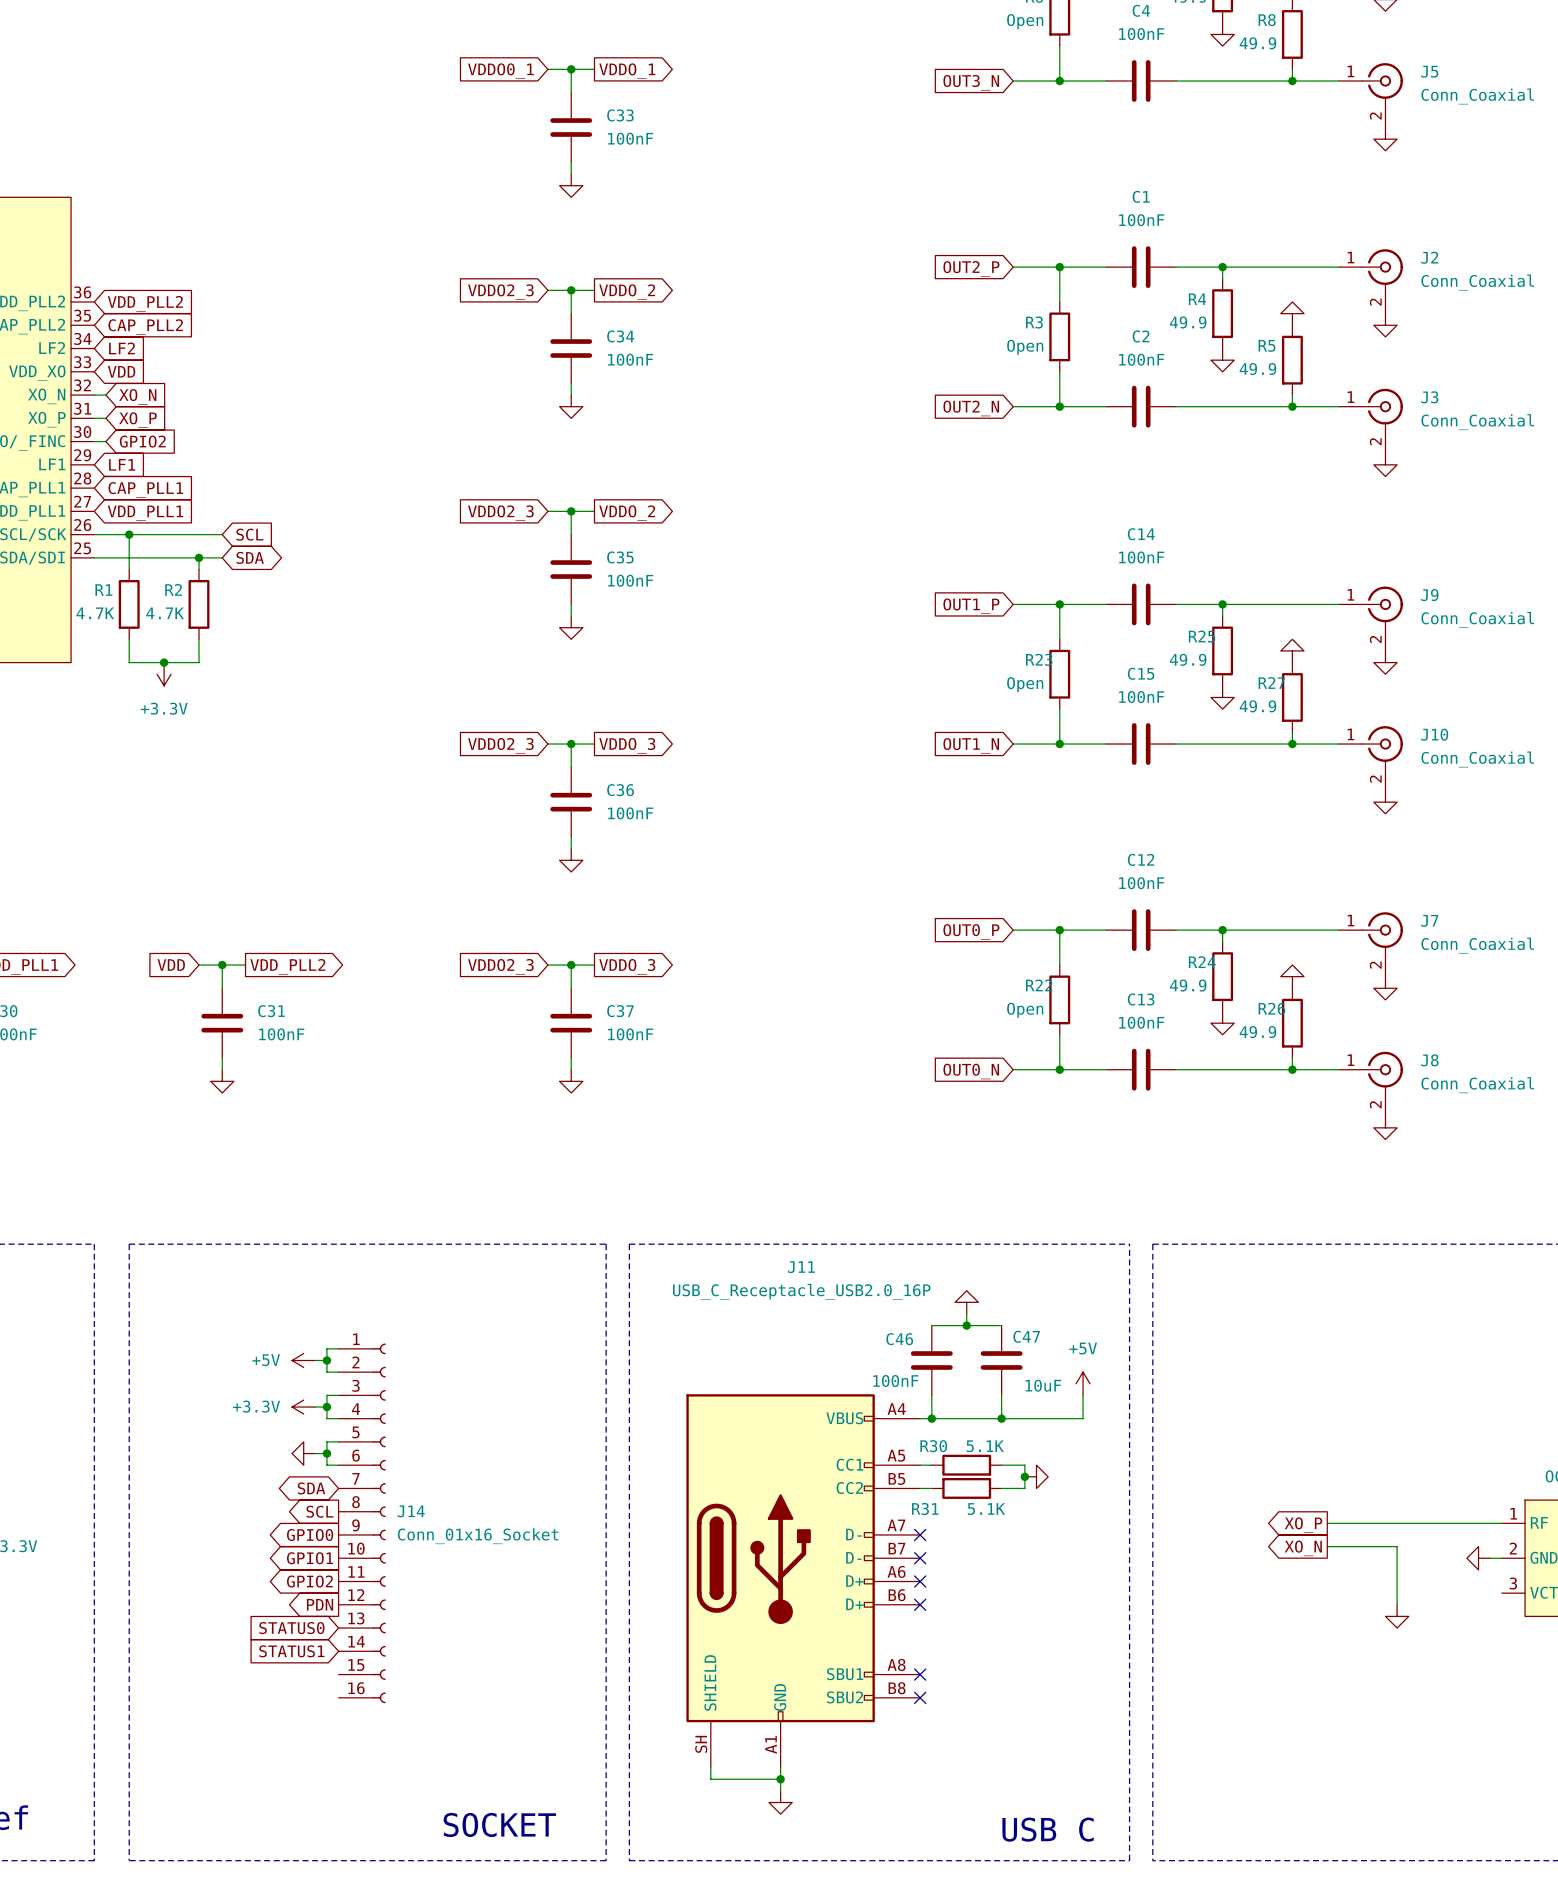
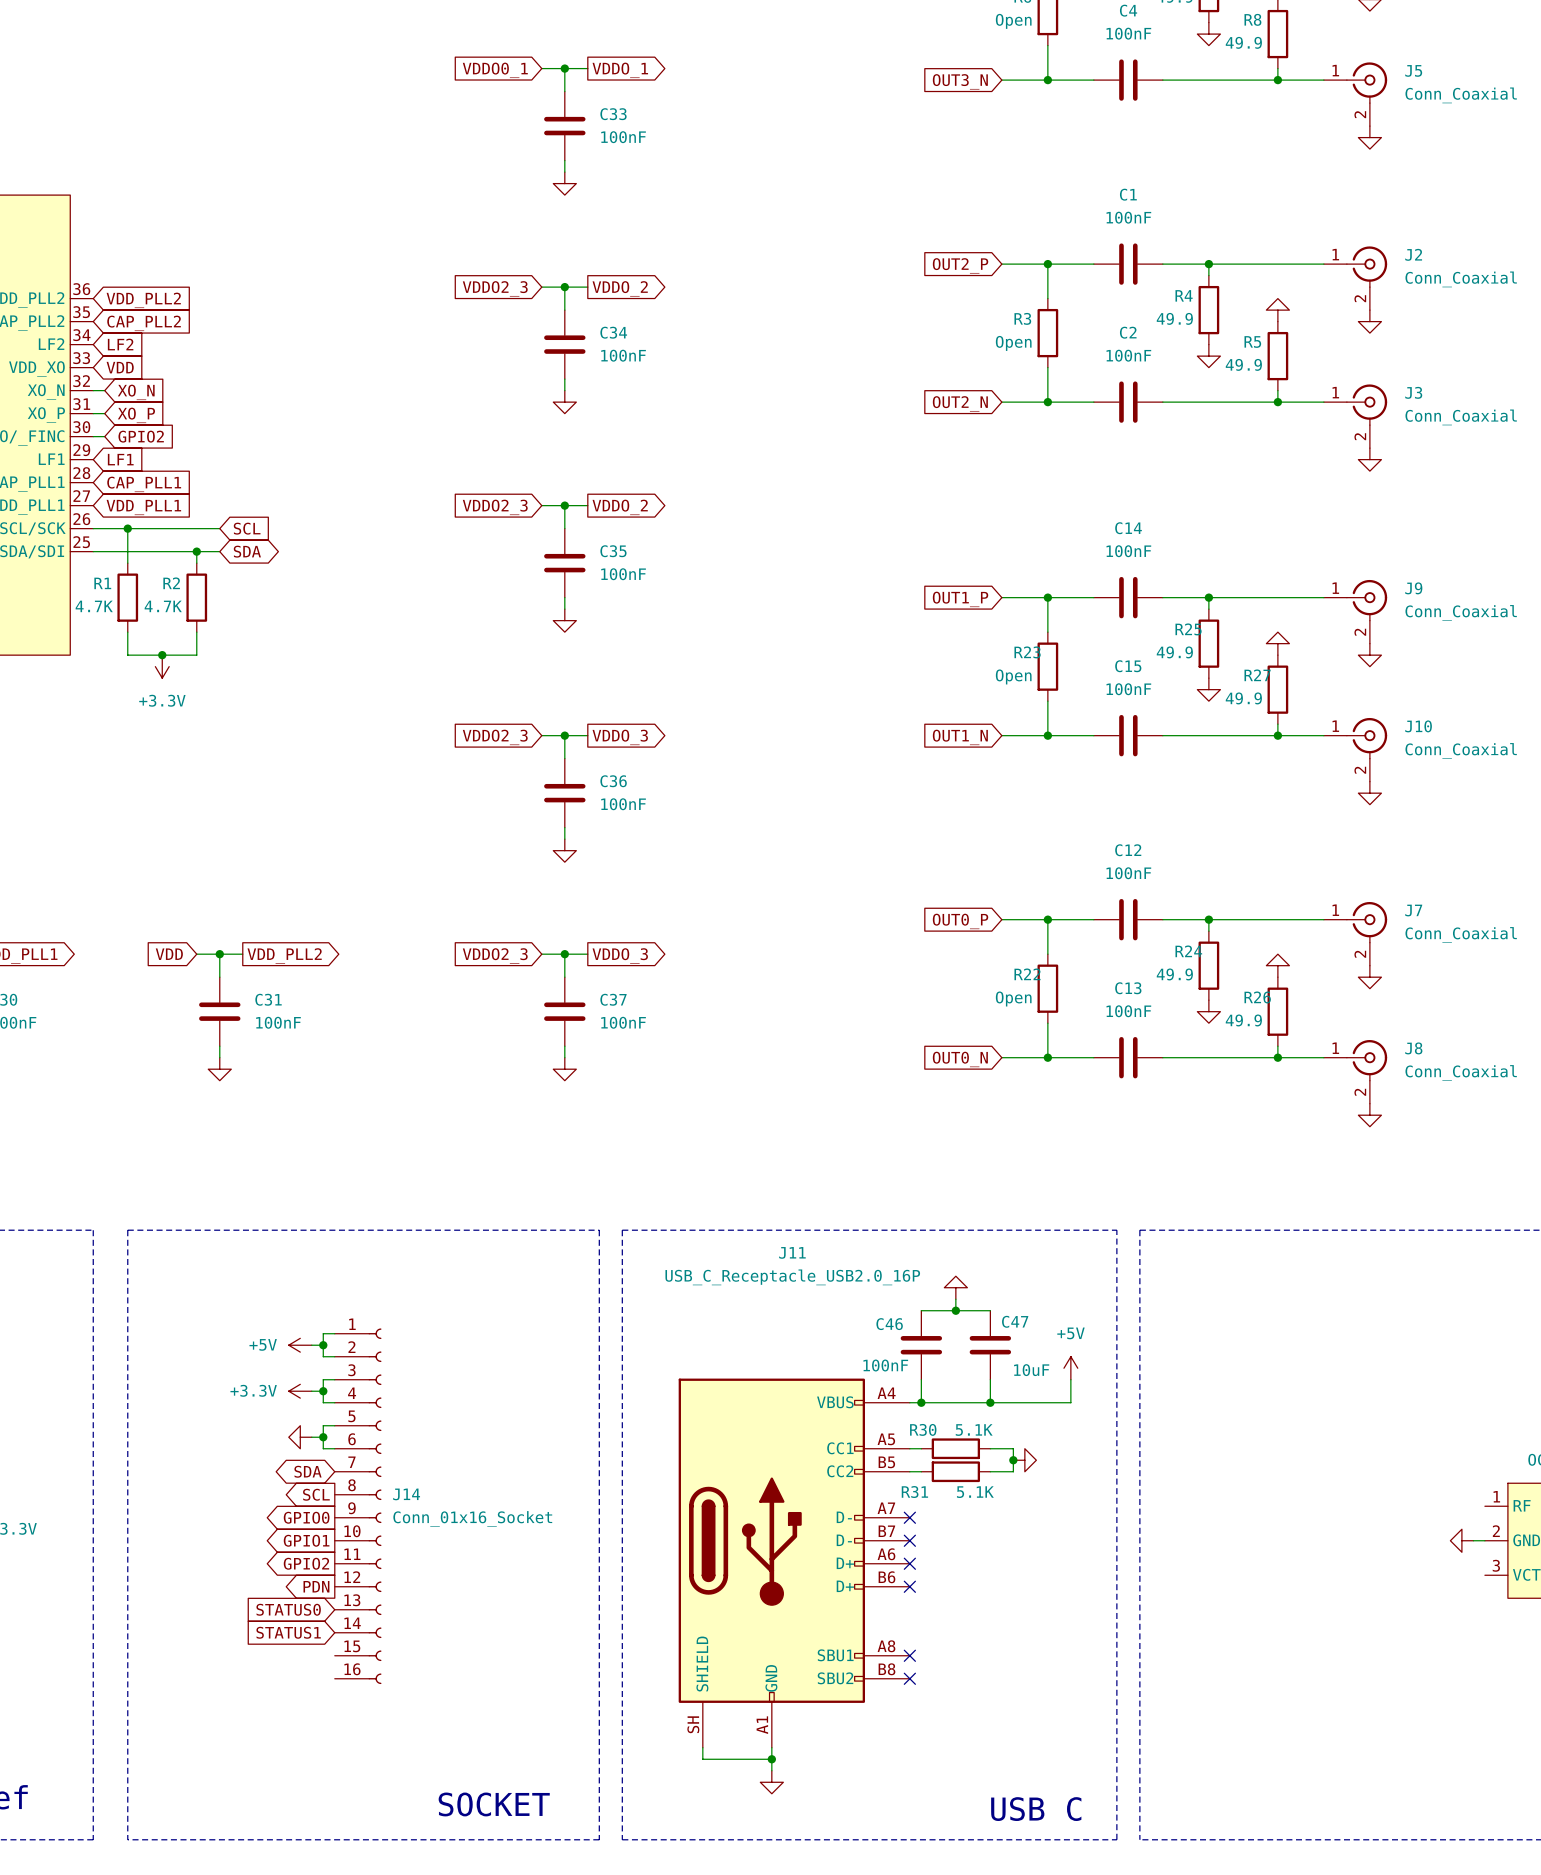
wire: (1327, 1523) (1501, 1523) -> none
global label: XO_P (1303, 1525) -> none
wire: (1327, 1546) (1397, 1546) (1397, 1604) -> none
global label: XO_N (1303, 1548) -> none
power symbol: (1397, 1616) -> none

